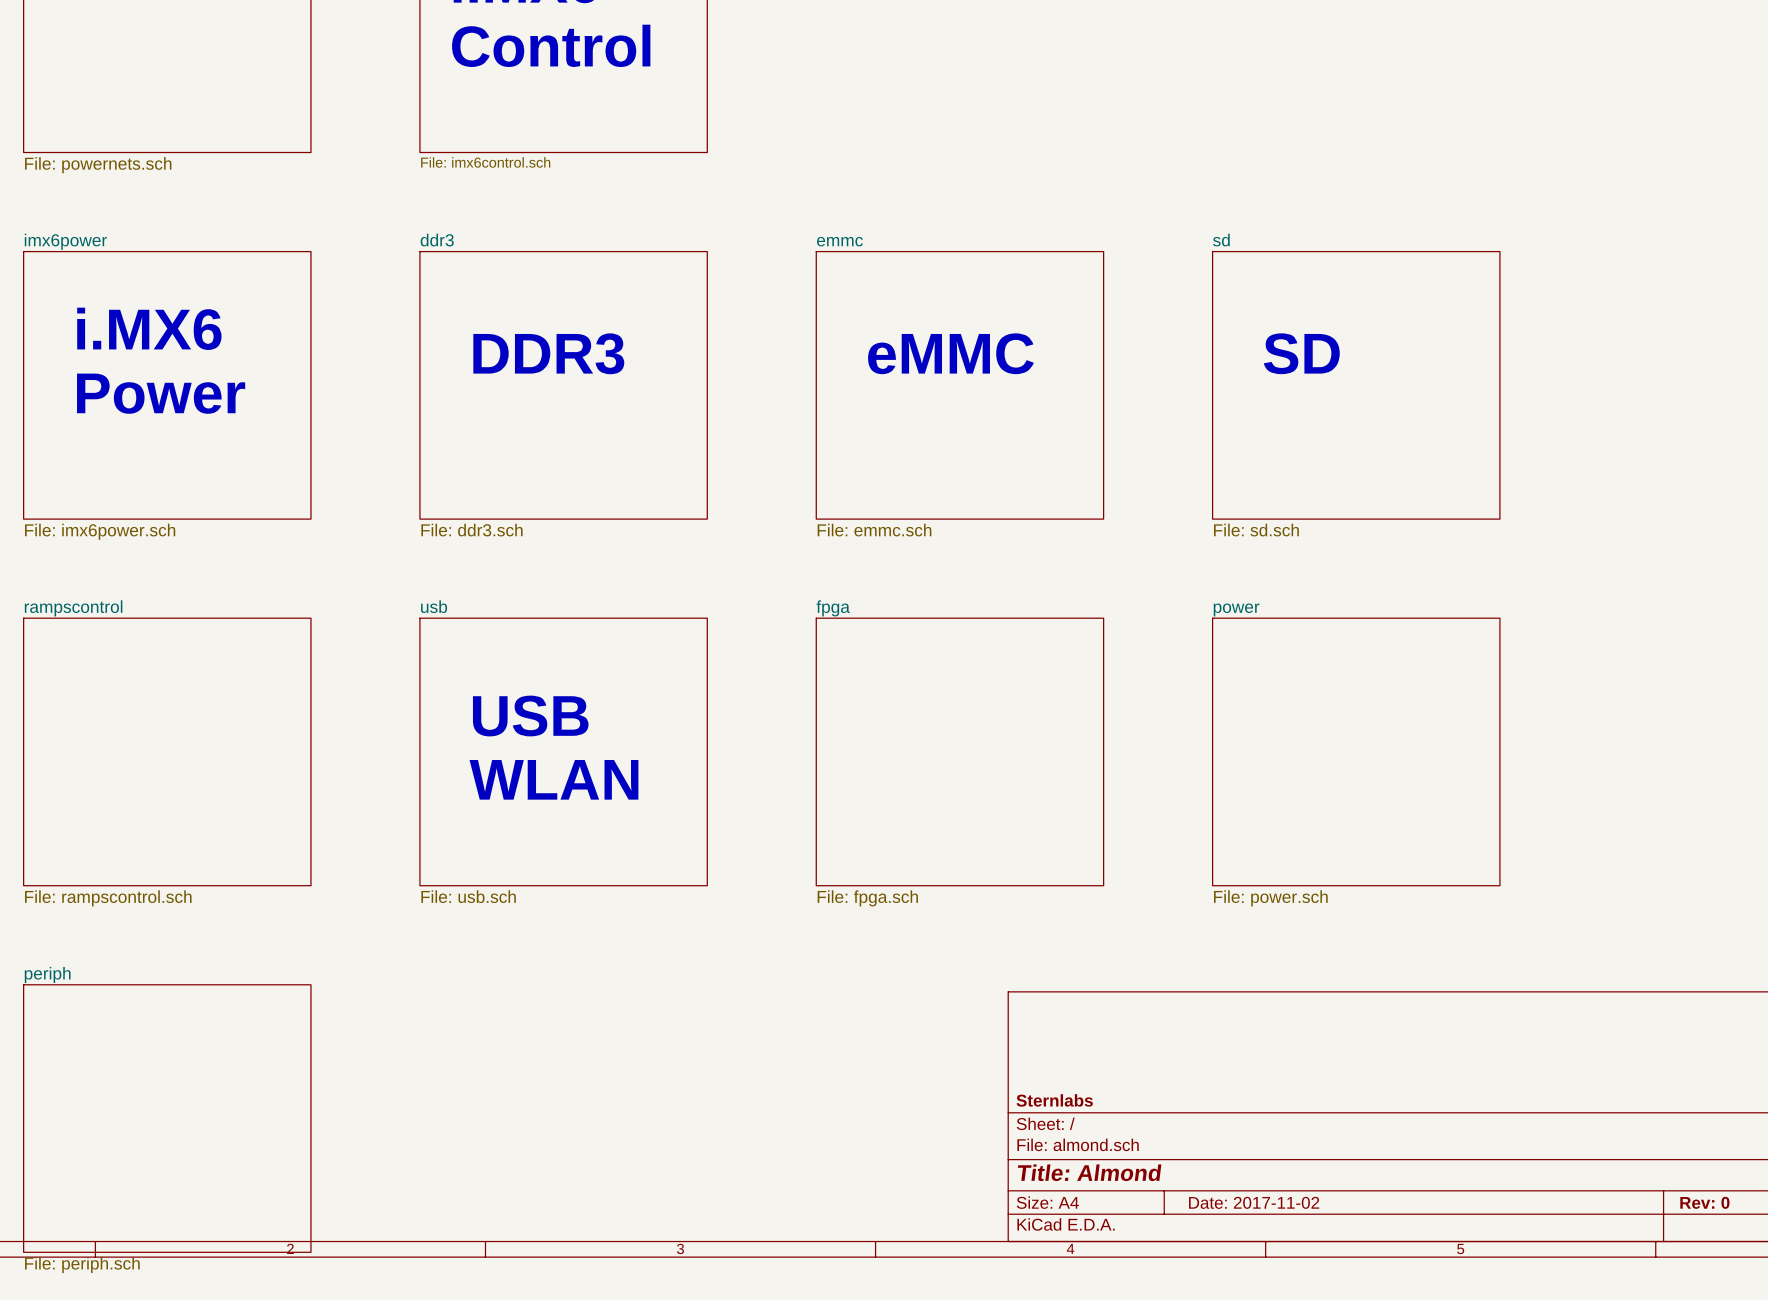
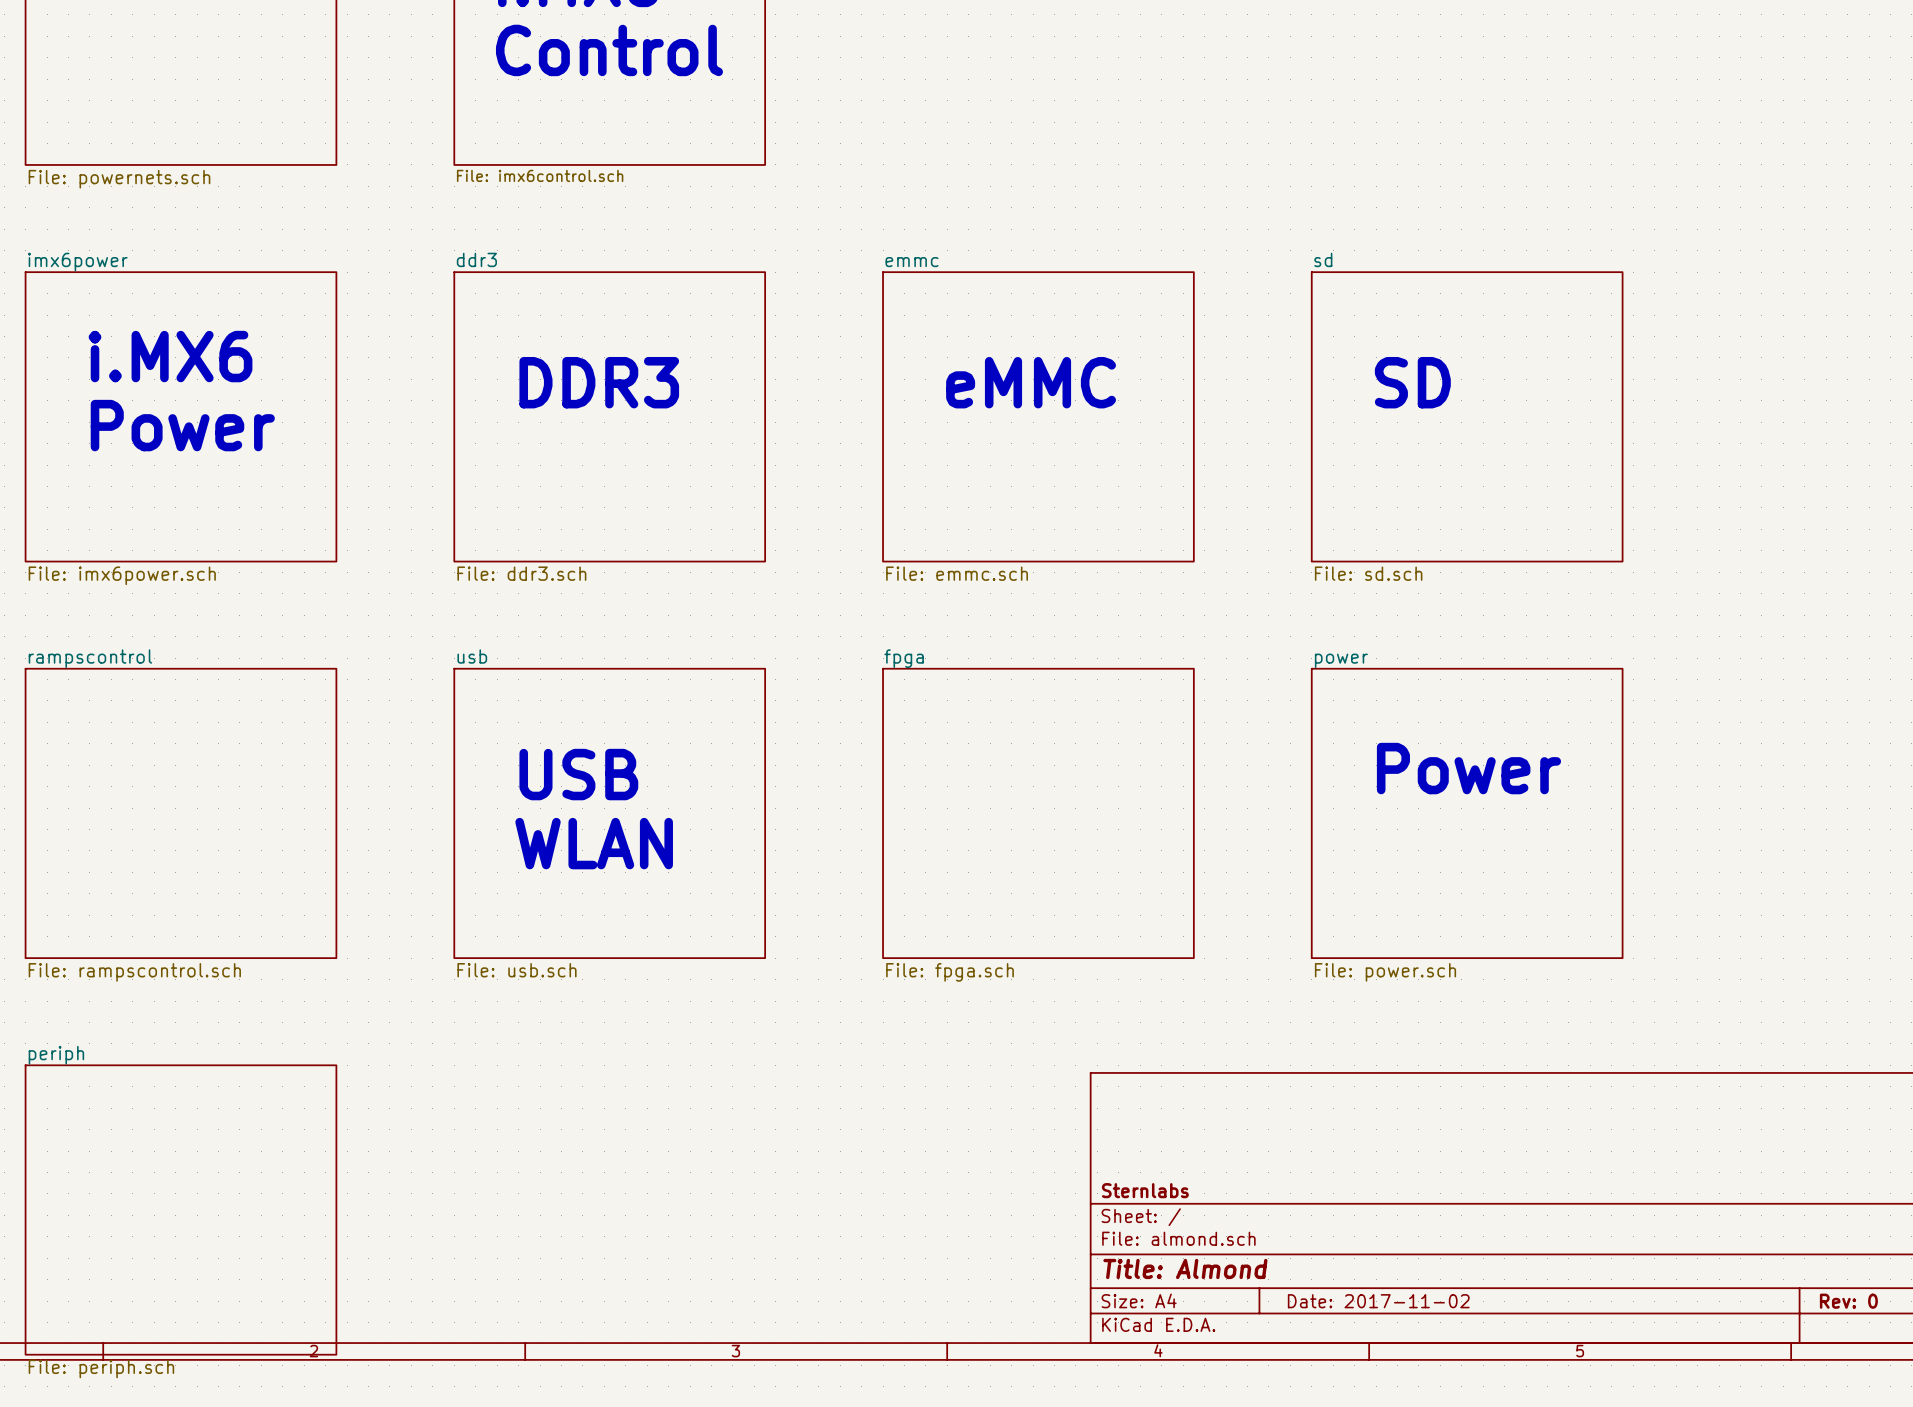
text: none -> Power (1468, 768)

